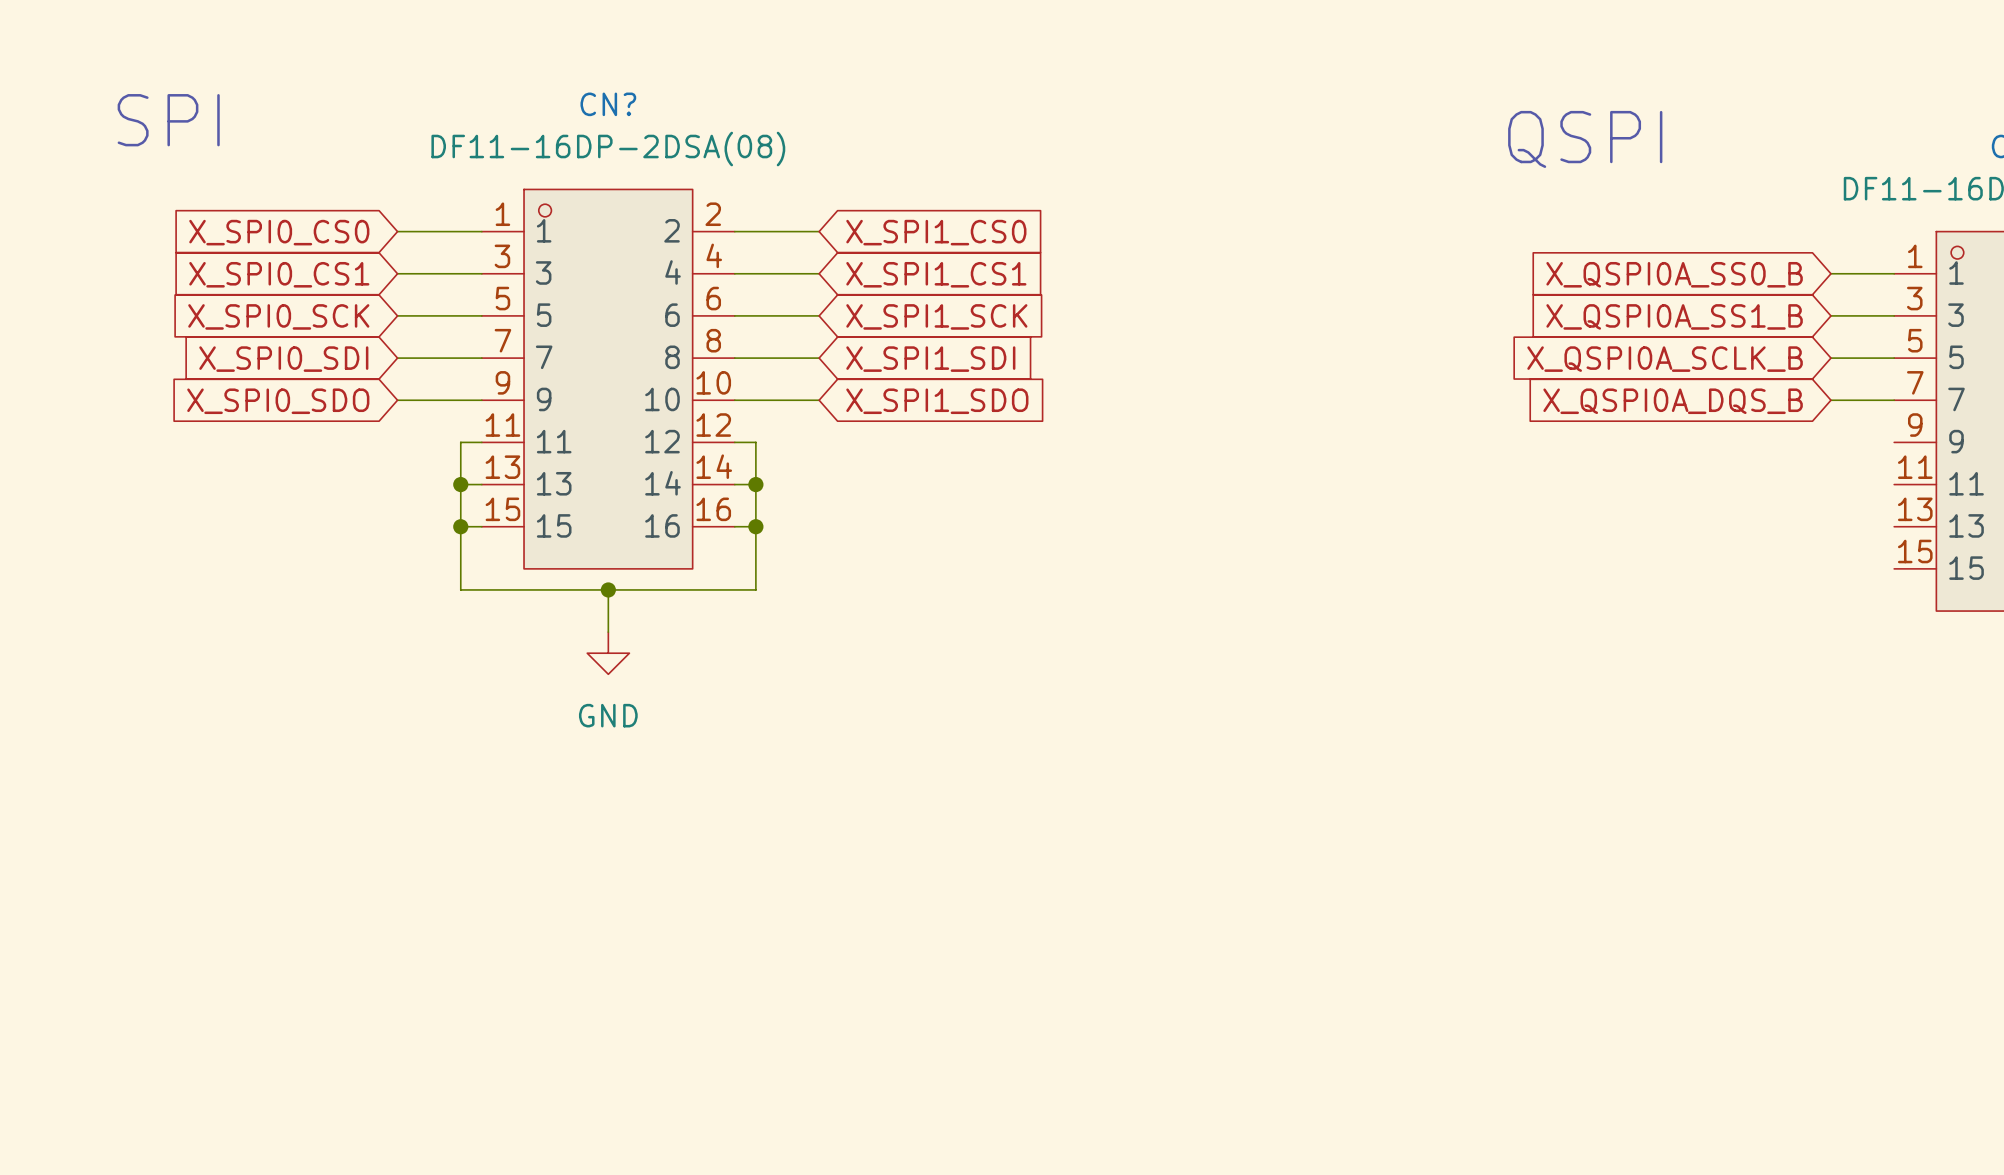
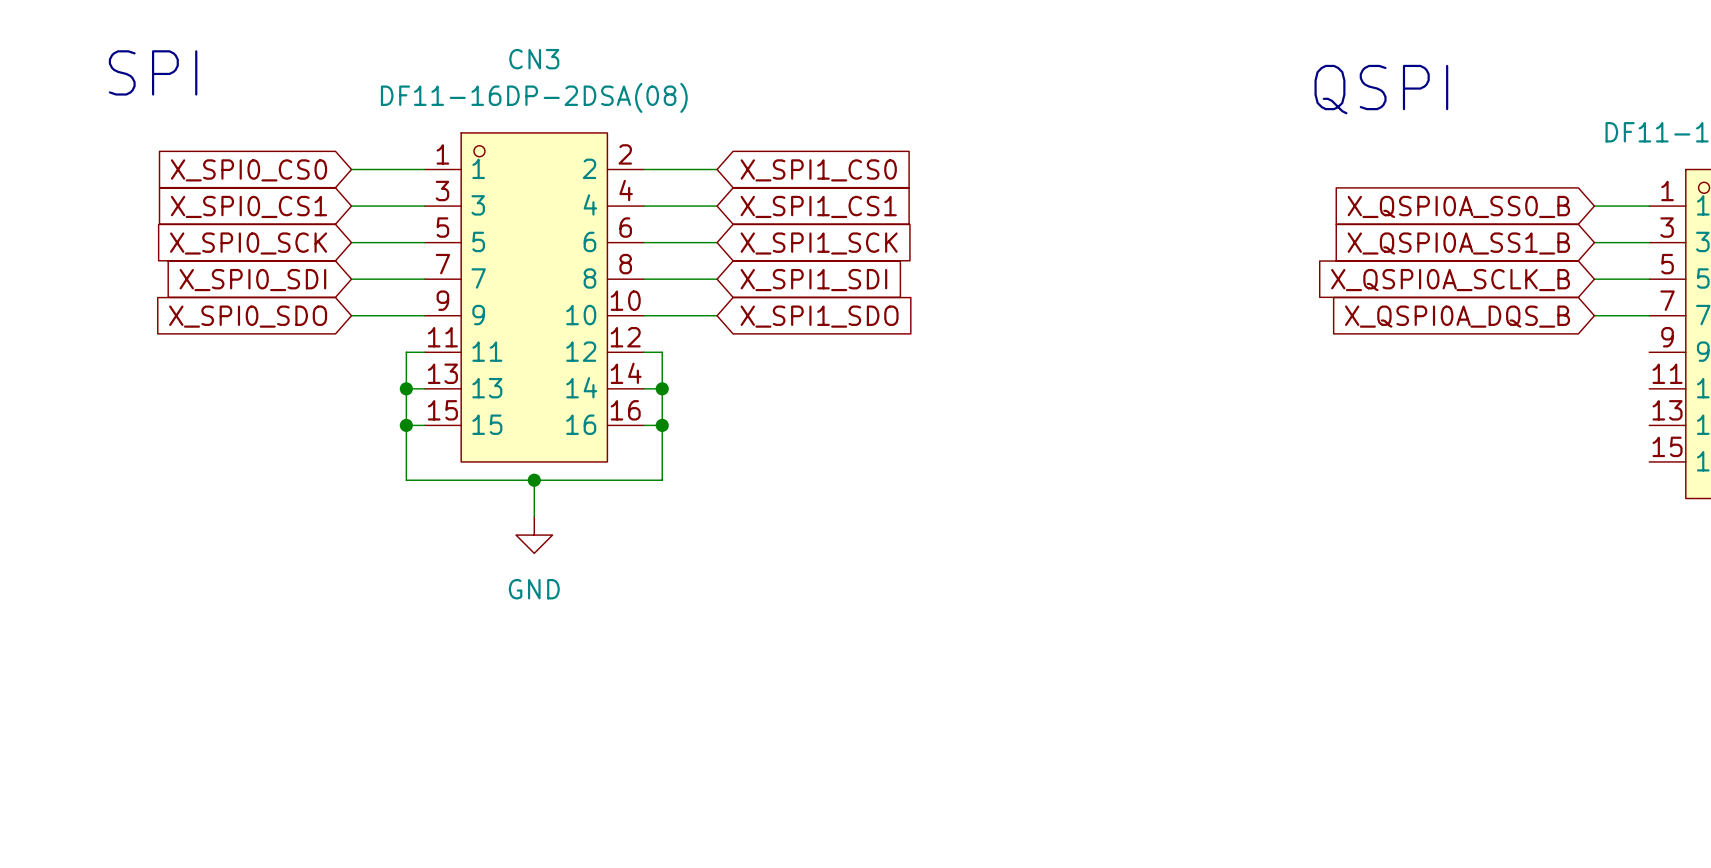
CN? name: CN? (608, 104) -> CN3 (534, 59)

